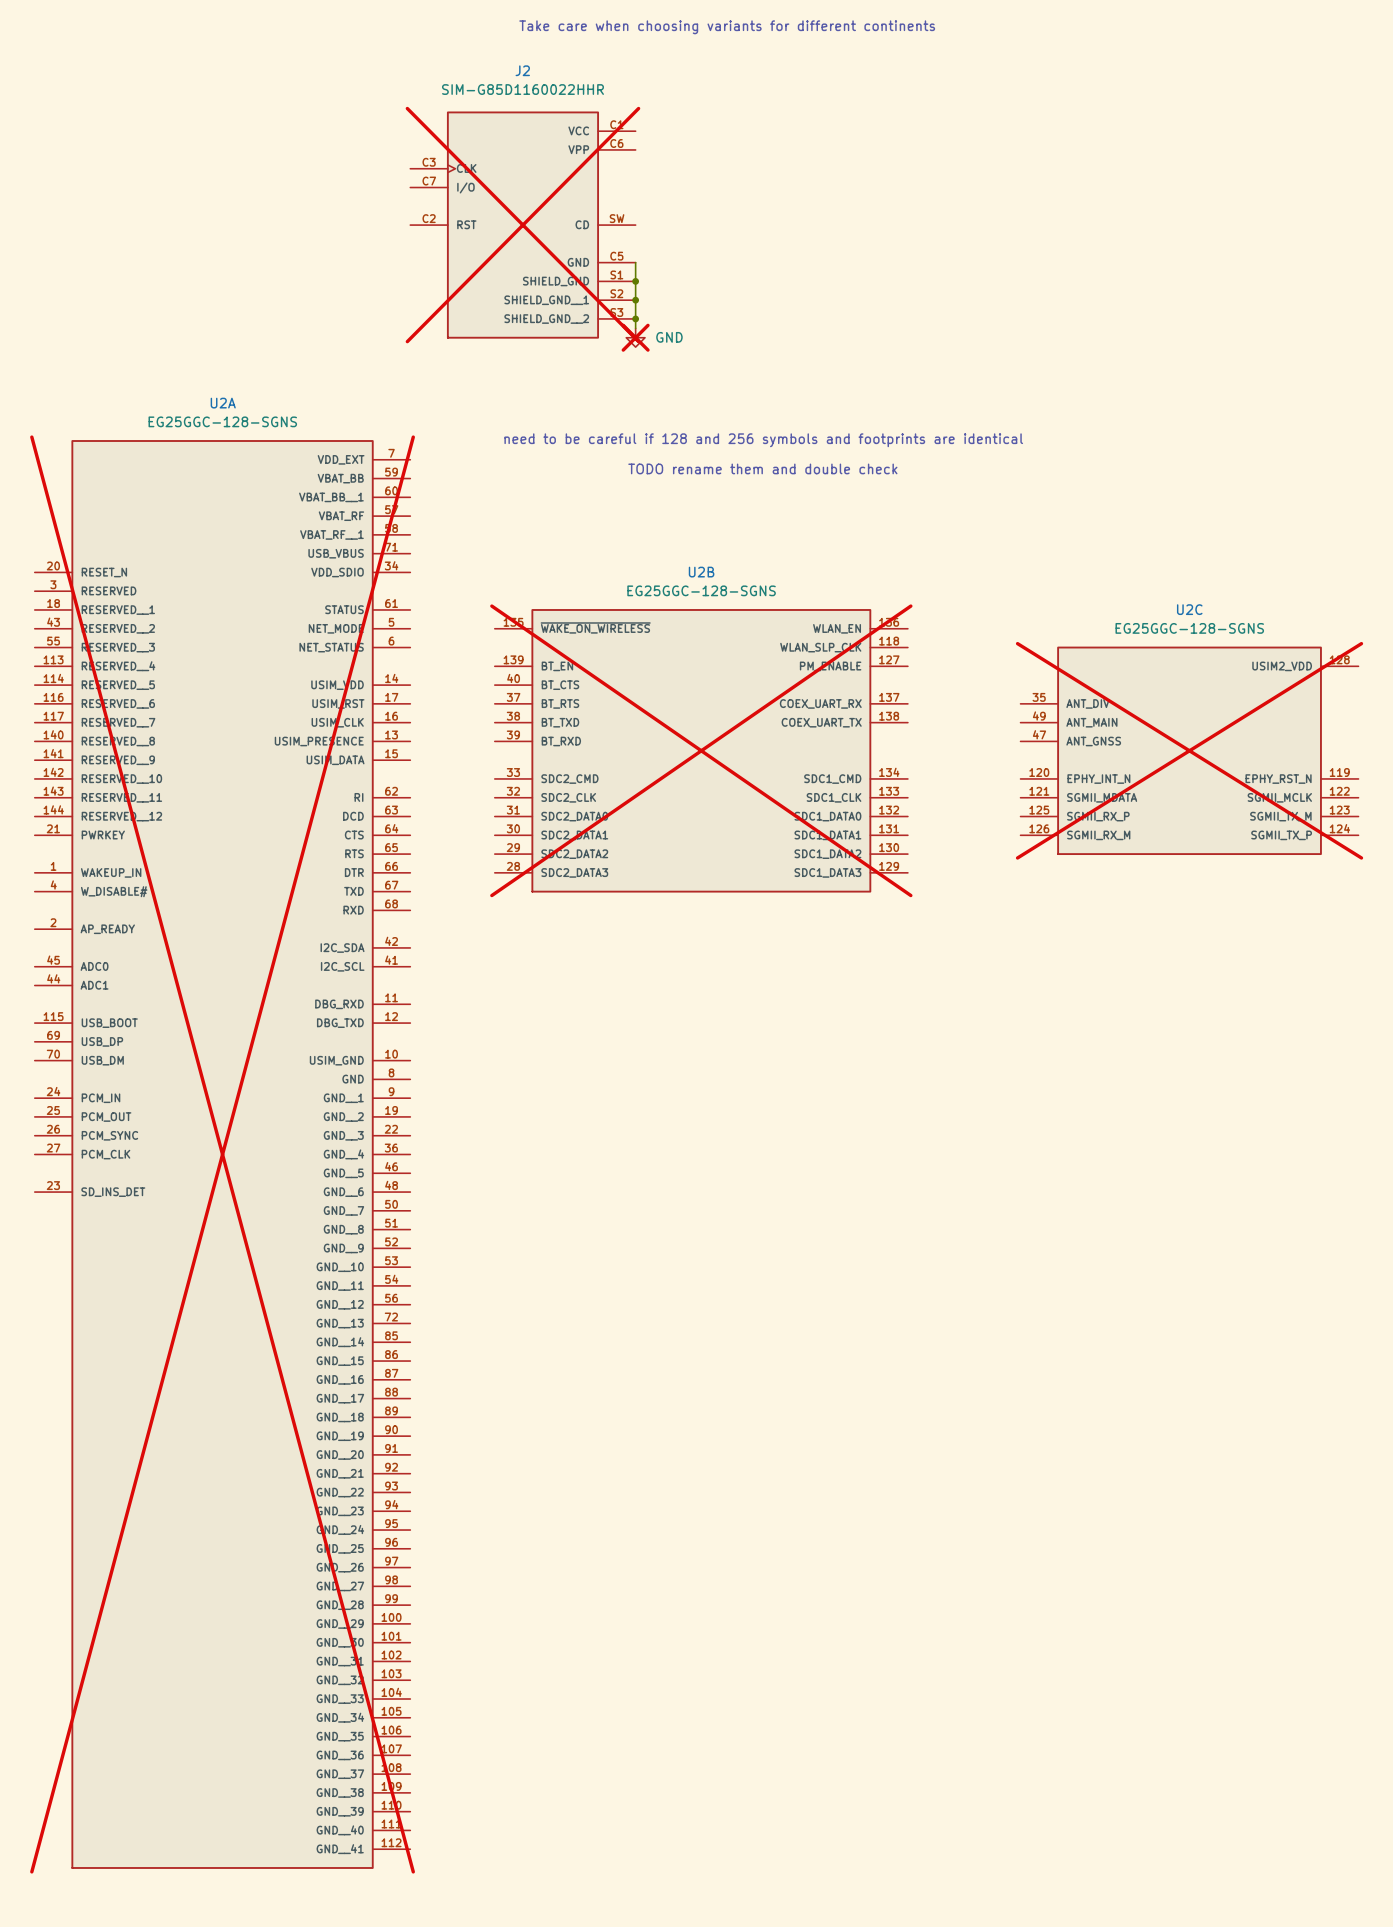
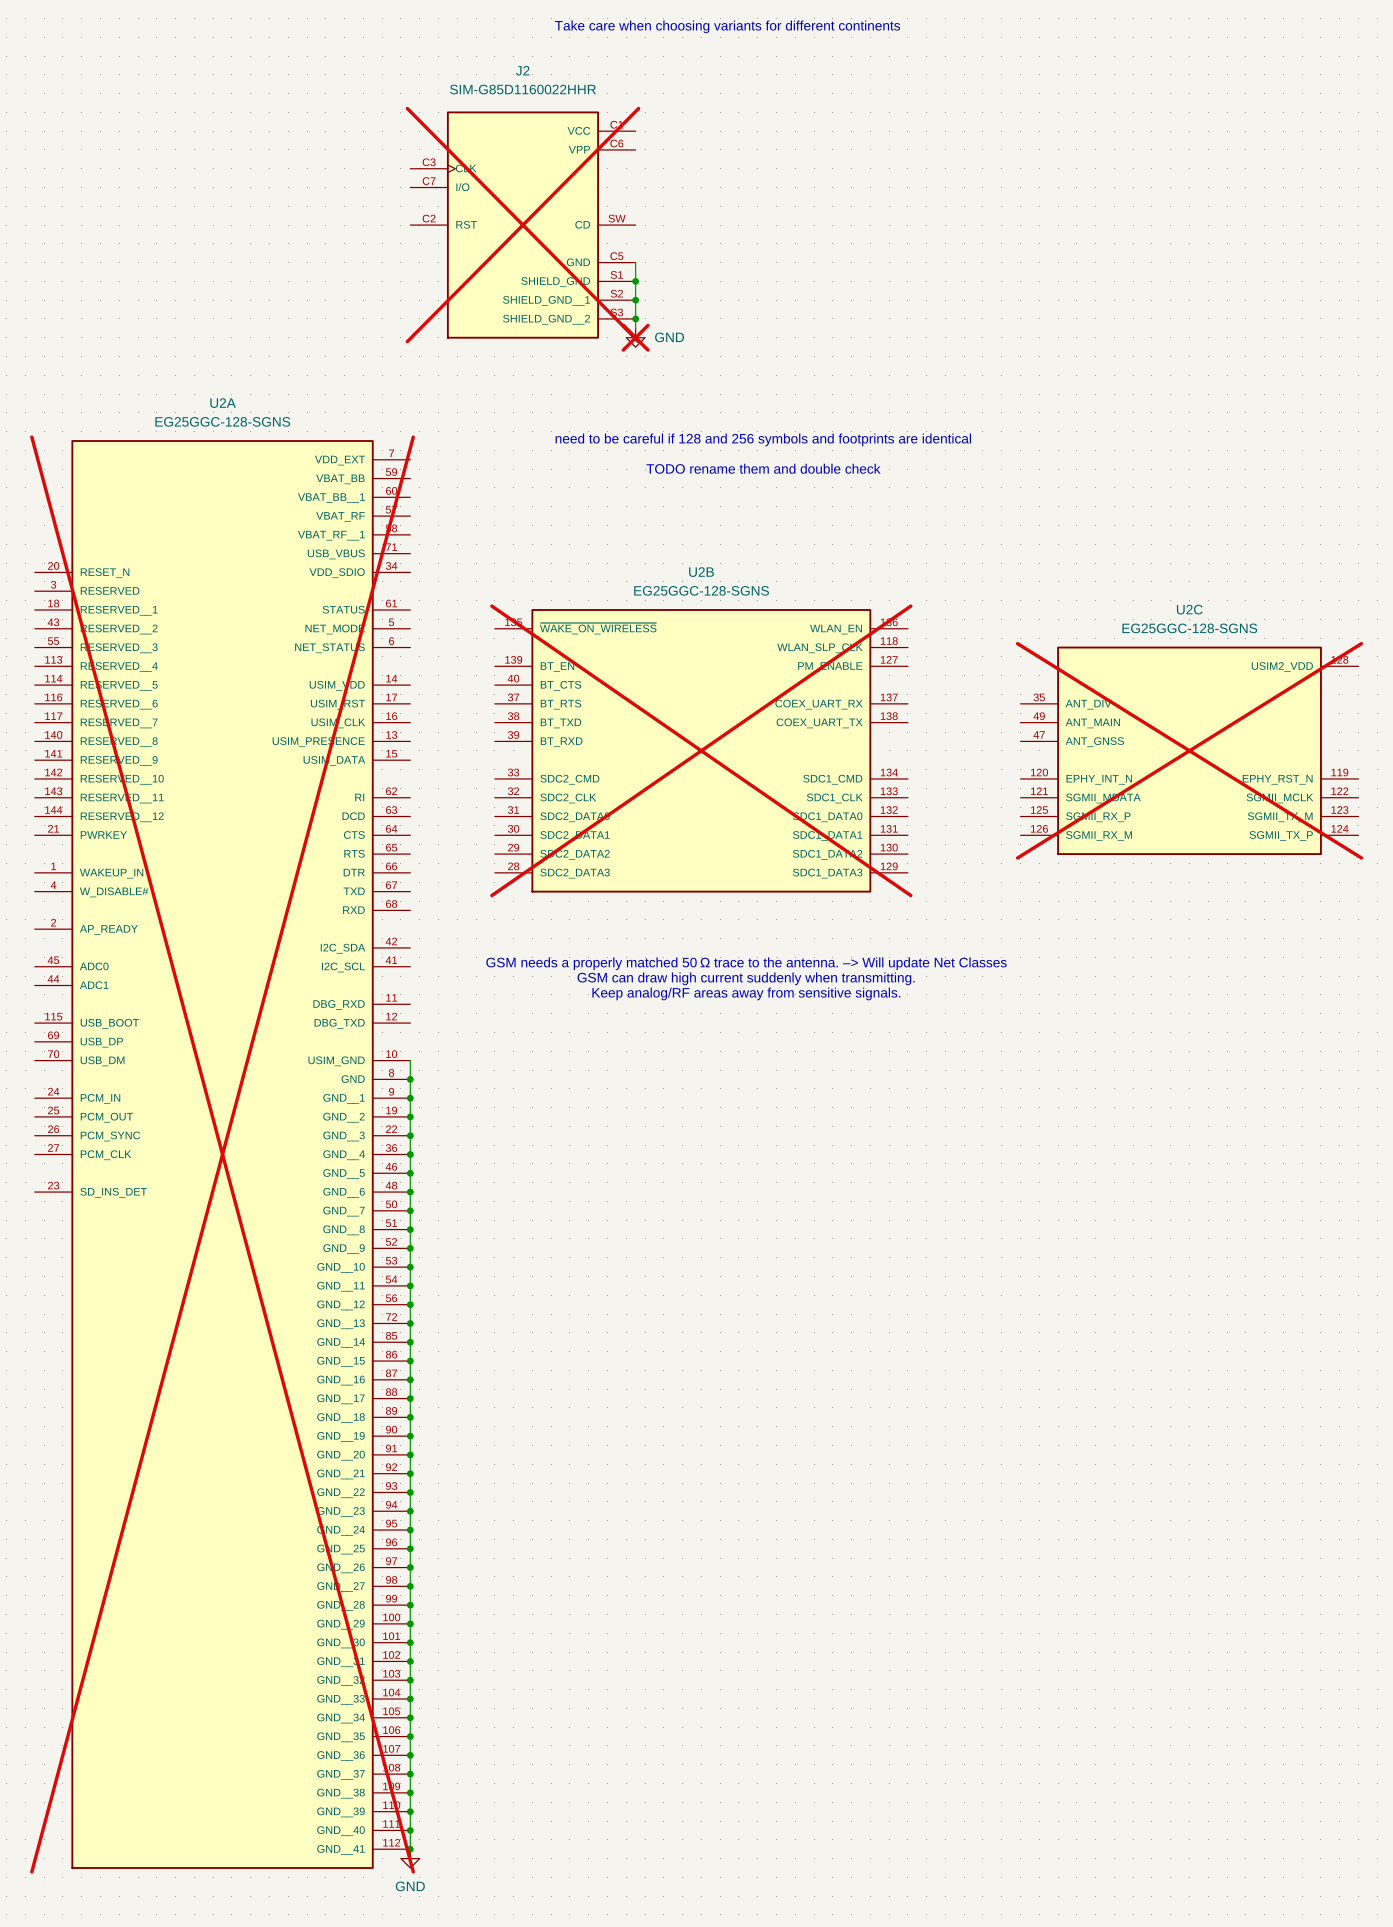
text: none -> GSM needs a properly matched 50 Ω trace to the antenna. –> Will update Net Classes (746, 963)
text: none -> GSM can draw high current suddenly when transmitting. (746, 978)
text: none -> Keep analog/RF areas away from sensitive signals. (746, 993)
wire: none -> (410, 1060) (410, 1849)
junction: none -> (410, 1079)
junction: none -> (410, 1098)
junction: none -> (410, 1116)
junction: none -> (410, 1135)
junction: none -> (410, 1154)
junction: none -> (410, 1173)
junction: none -> (410, 1192)
junction: none -> (410, 1210)
junction: none -> (410, 1229)
junction: none -> (410, 1248)
junction: none -> (410, 1267)
junction: none -> (410, 1285)
junction: none -> (410, 1304)
junction: none -> (410, 1323)
junction: none -> (410, 1342)
junction: none -> (410, 1361)
junction: none -> (410, 1379)
junction: none -> (410, 1398)
junction: none -> (410, 1417)
junction: none -> (410, 1436)
junction: none -> (410, 1454)
junction: none -> (410, 1473)
junction: none -> (410, 1492)
junction: none -> (410, 1511)
junction: none -> (410, 1530)
junction: none -> (410, 1548)
junction: none -> (410, 1567)
junction: none -> (410, 1586)
junction: none -> (410, 1605)
junction: none -> (410, 1623)
junction: none -> (410, 1642)
junction: none -> (410, 1661)
junction: none -> (410, 1680)
junction: none -> (410, 1699)
junction: none -> (410, 1717)
junction: none -> (410, 1736)
junction: none -> (410, 1755)
junction: none -> (410, 1774)
junction: none -> (410, 1792)
junction: none -> (410, 1811)
junction: none -> (410, 1830)
junction: none -> (410, 1849)
power symbol: none -> GND (410, 1858)

